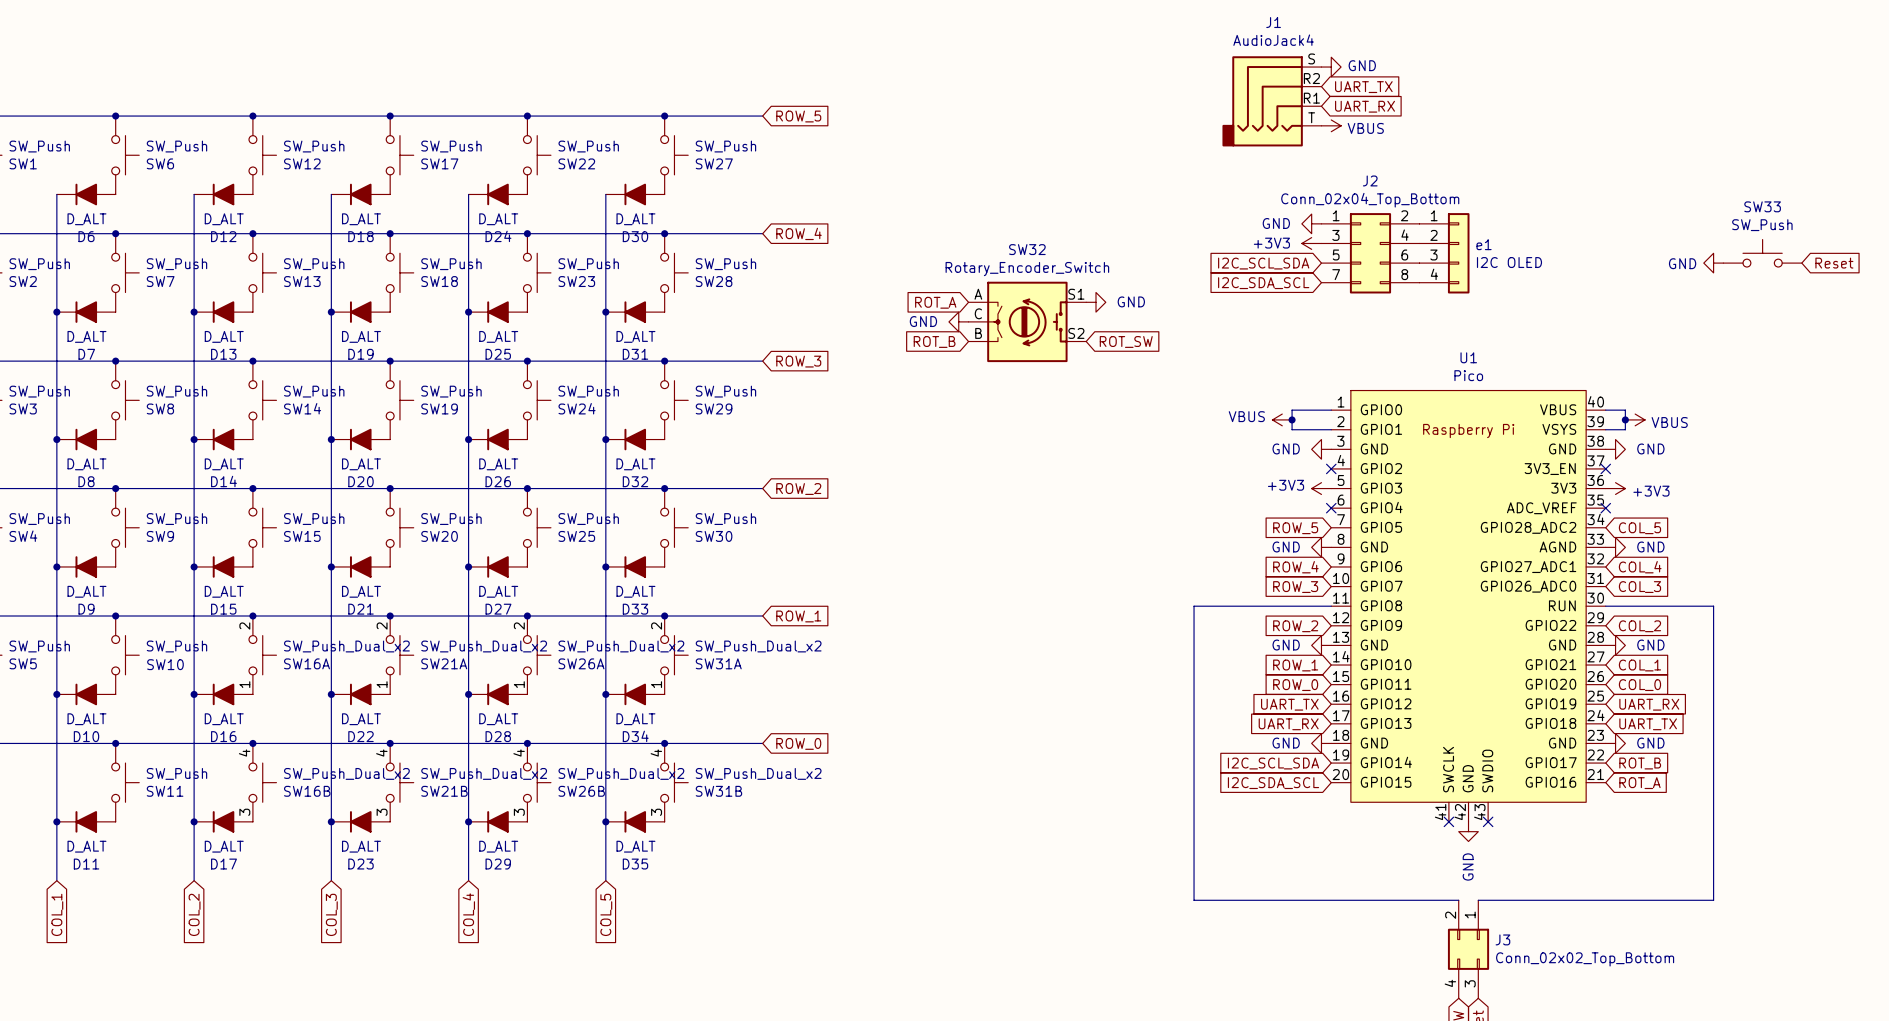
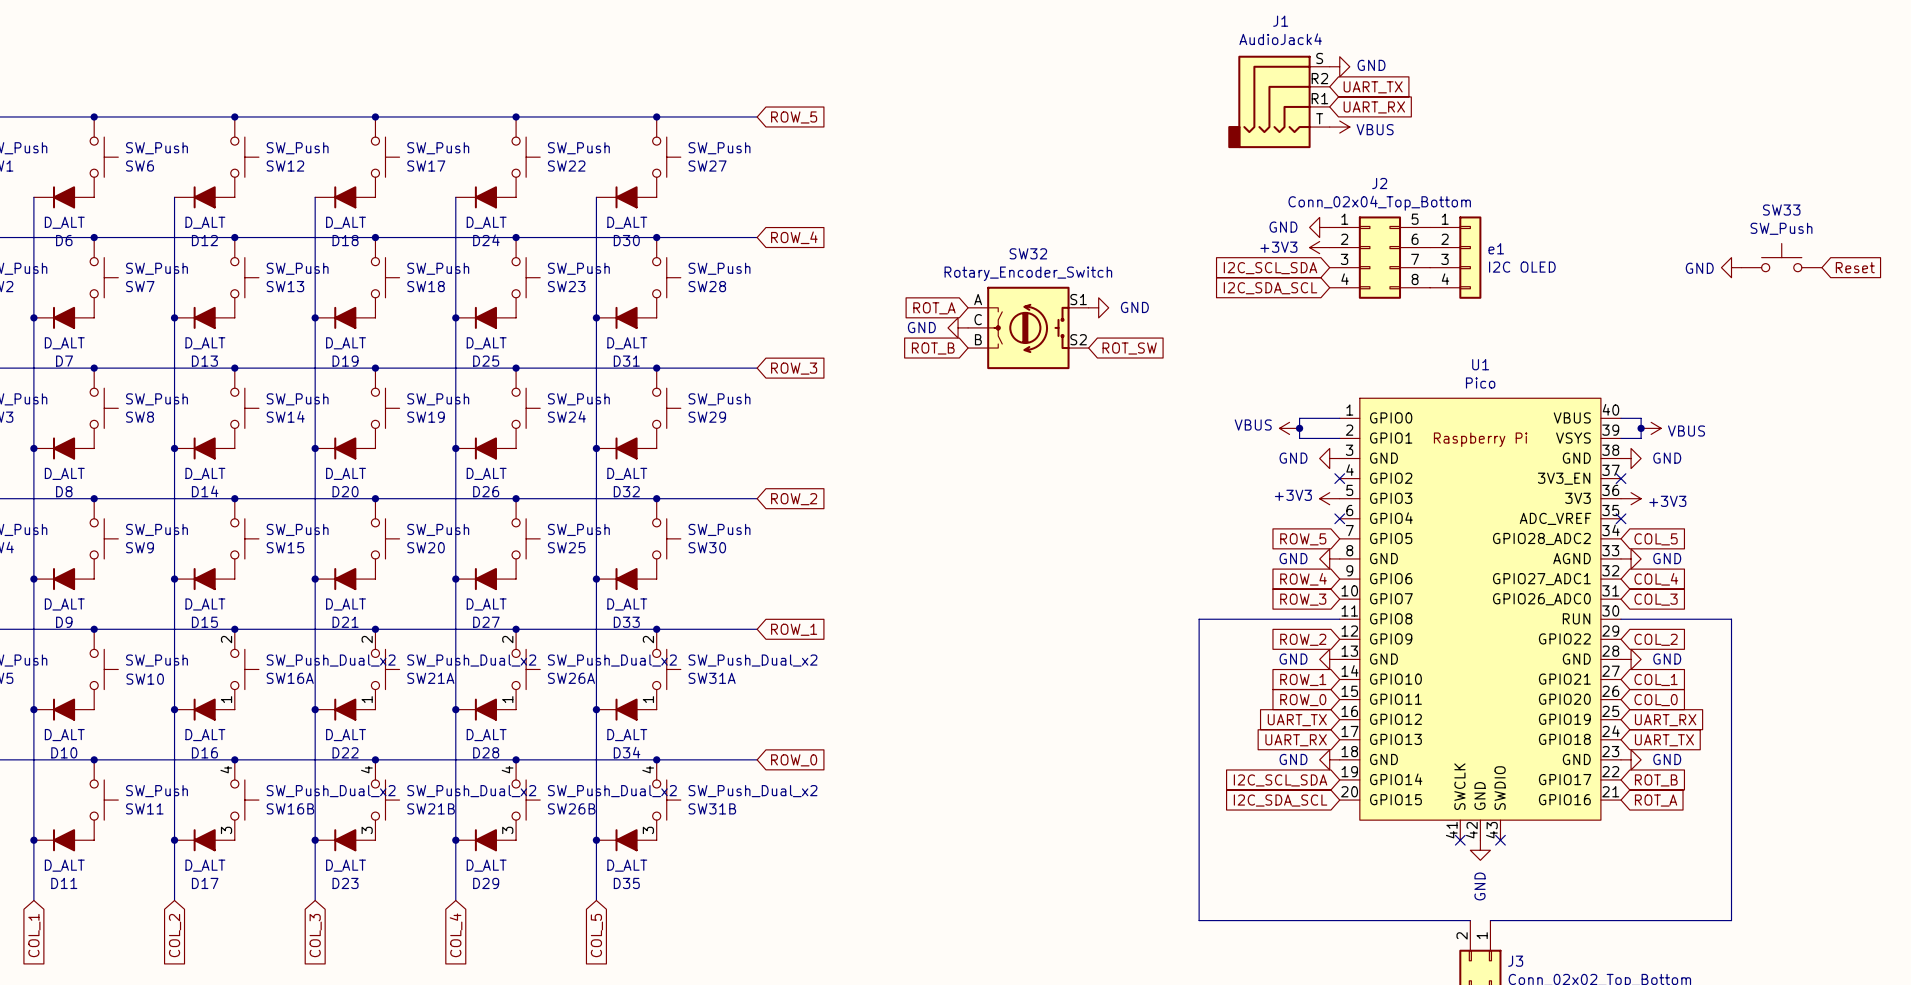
J2 pin number: 2 (1404, 215) -> 5 (1415, 219)
J2 pin number: 3 (1335, 235) -> 2 (1344, 239)
J2 pin number: 4 (1405, 235) -> 6 (1415, 239)
J2 pin number: 5 (1336, 255) -> 3 (1344, 259)
J2 pin number: 6 (1404, 255) -> 7 (1415, 259)
J2 pin number: 7 (1336, 274) -> 4 (1345, 279)

